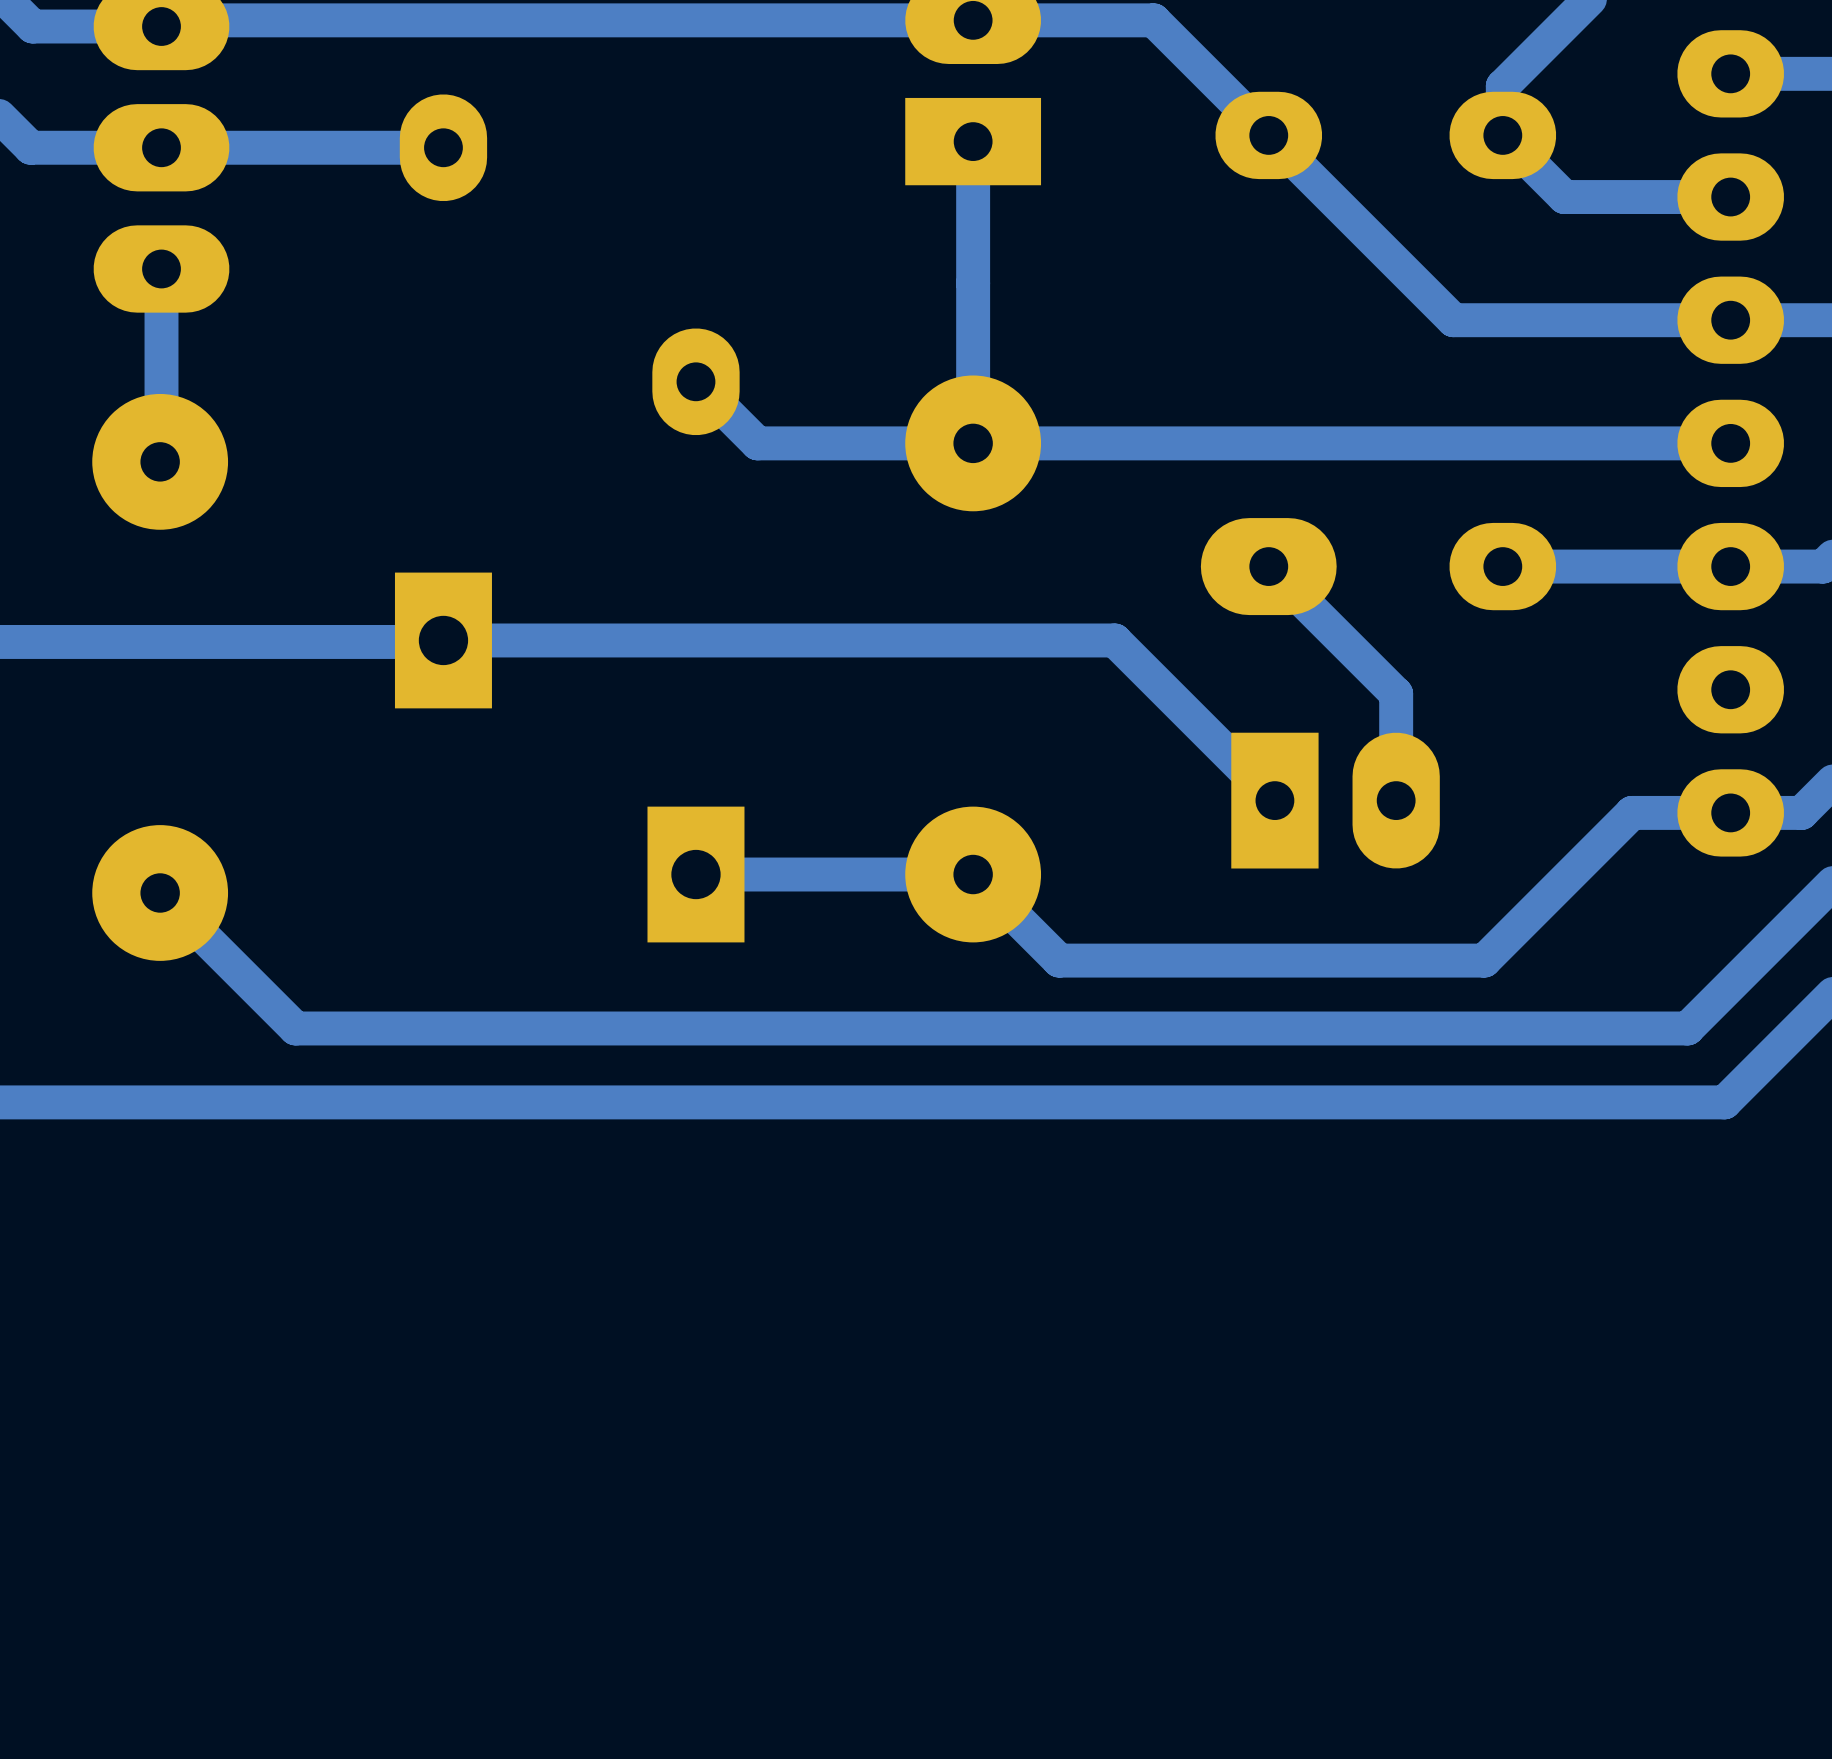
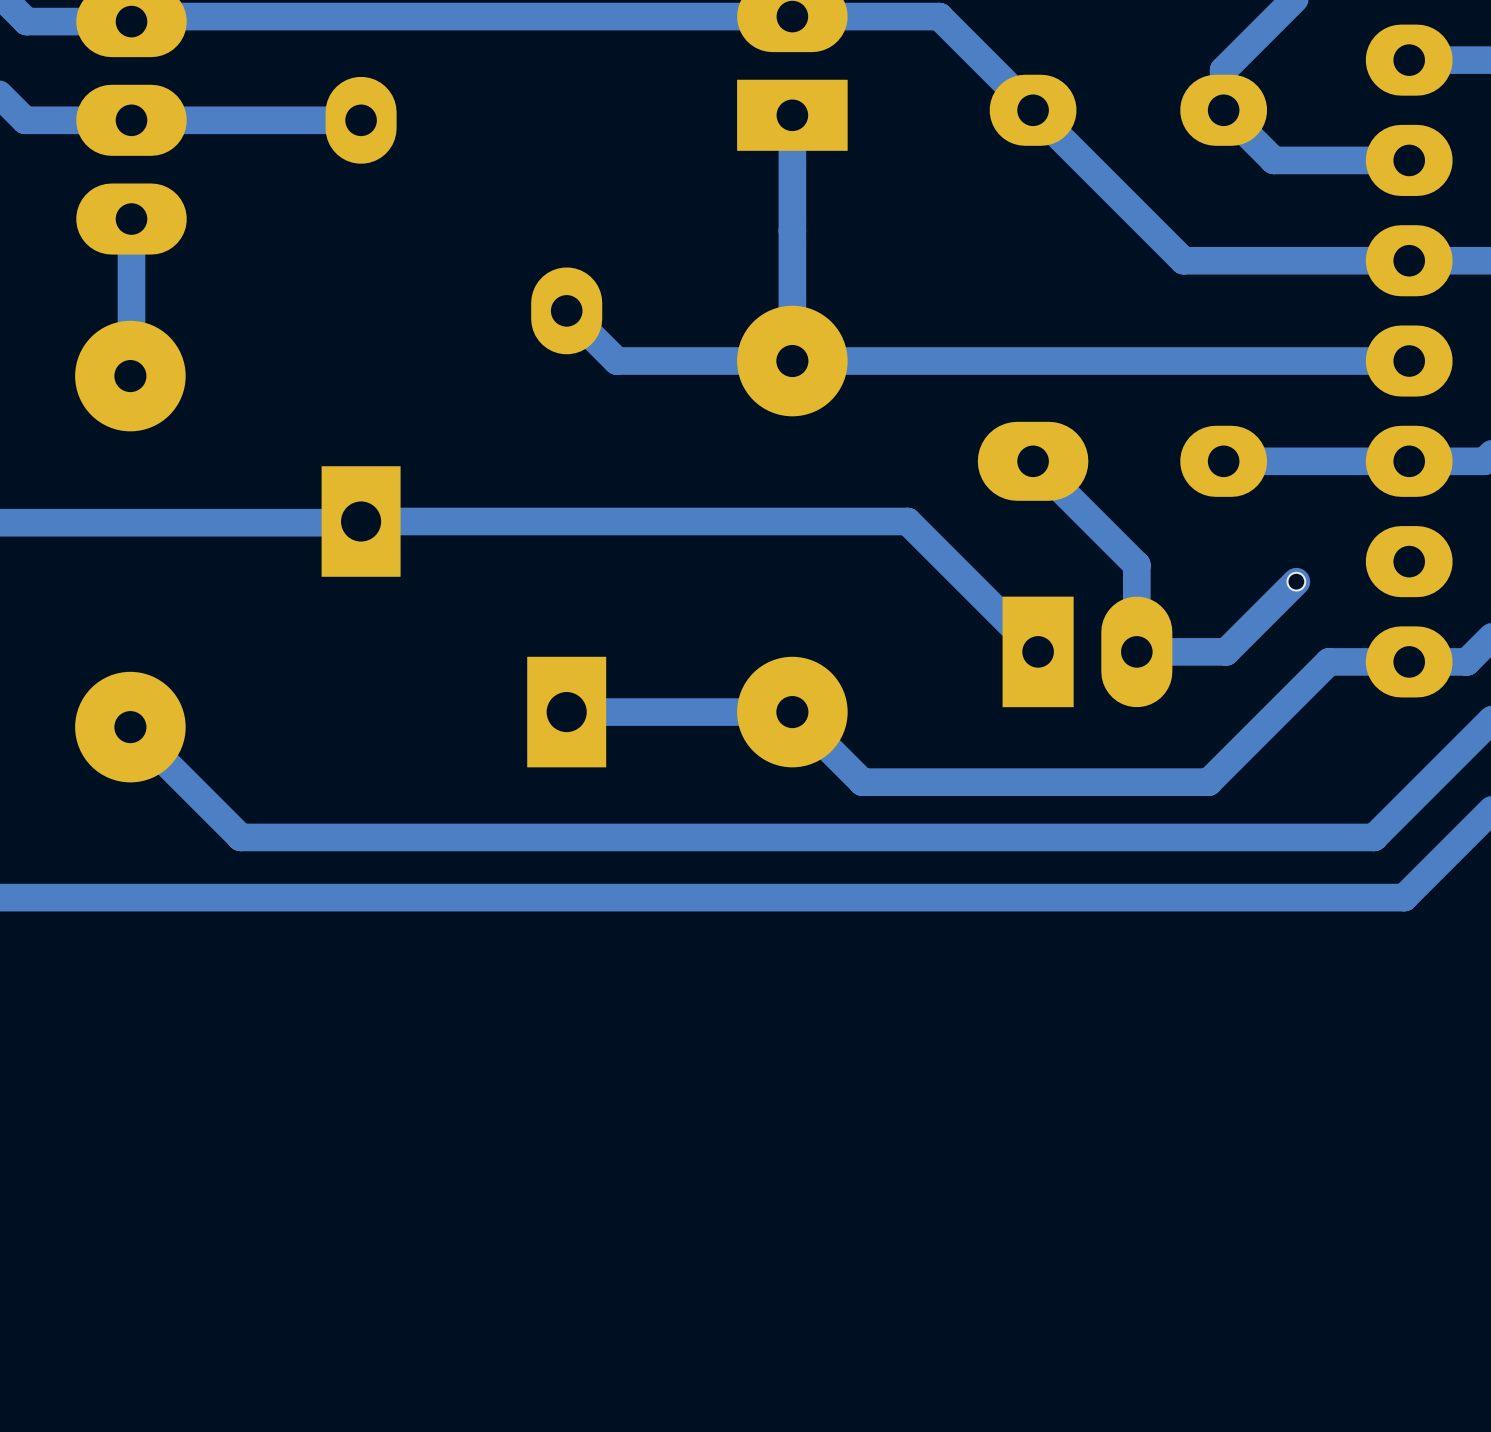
track: none -> (1296, 581) (1226, 651) (1136, 651)
via: none -> (1296, 581)

